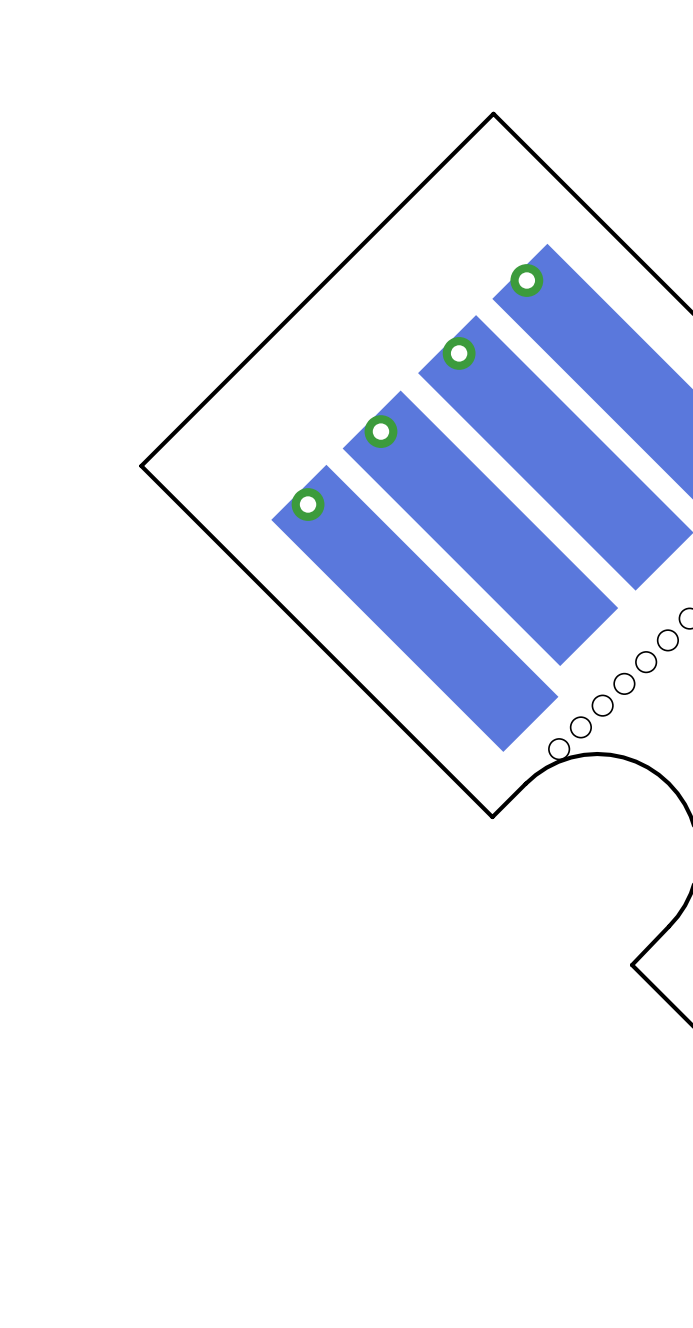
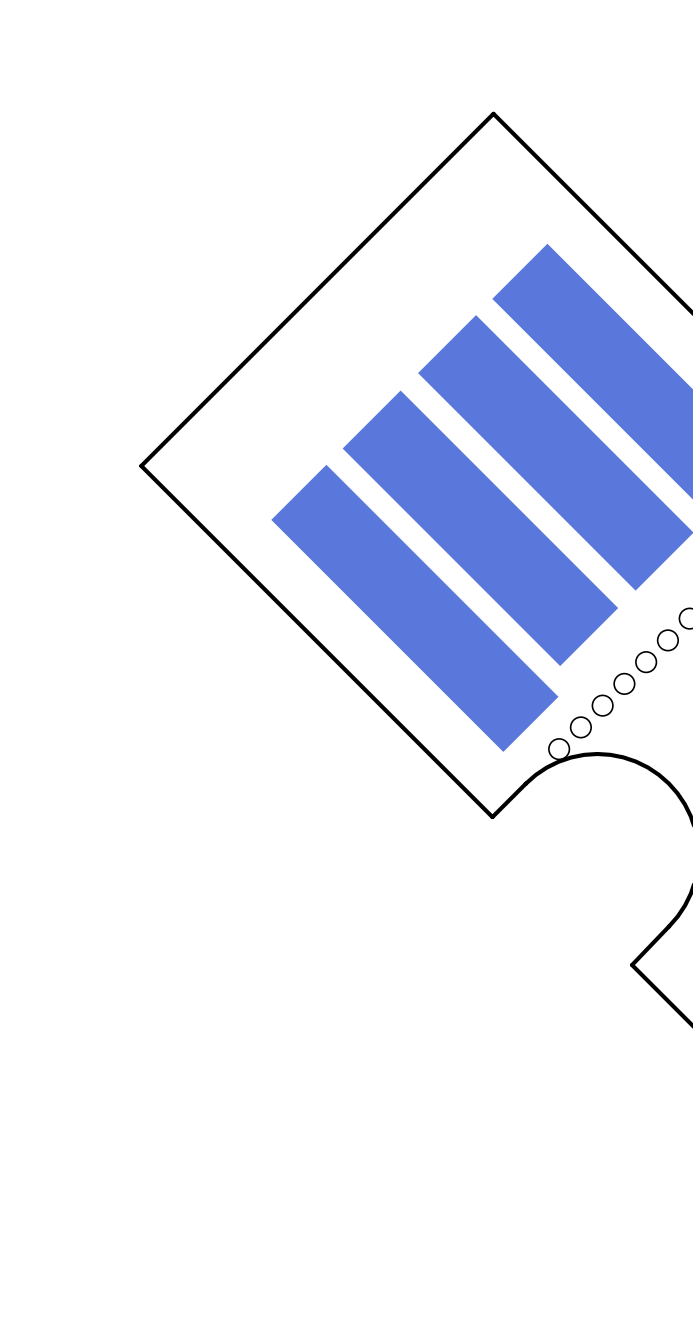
via: (526, 280) -> none
via: (459, 353) -> none
via: (380, 431) -> none
via: (308, 504) -> none

